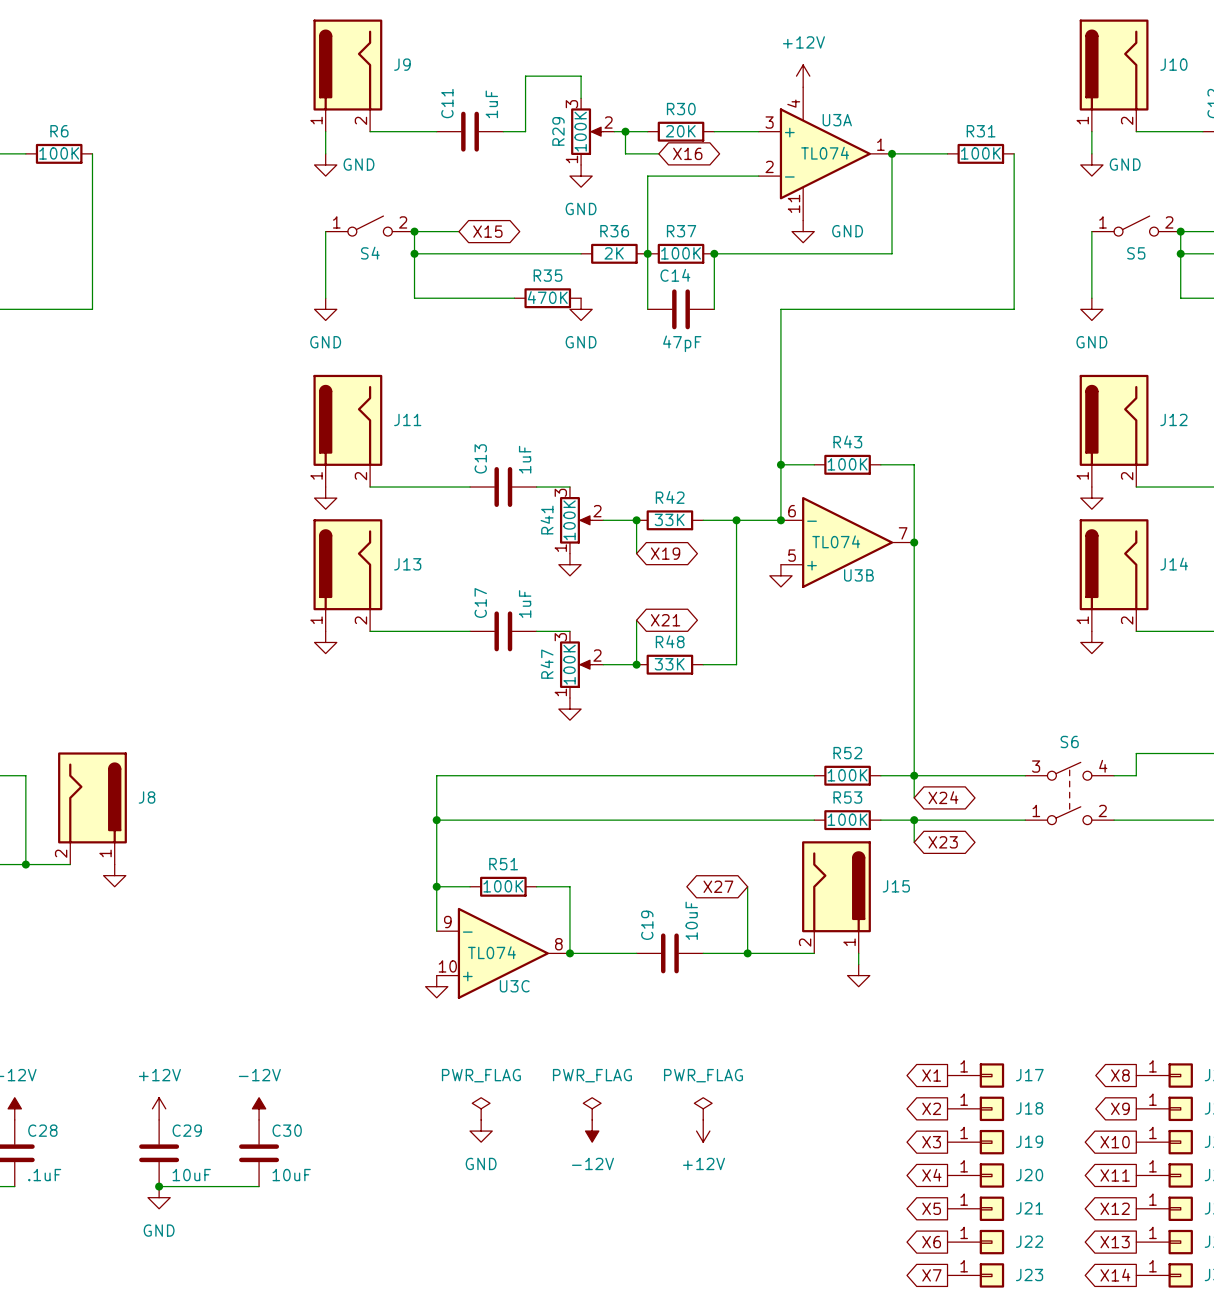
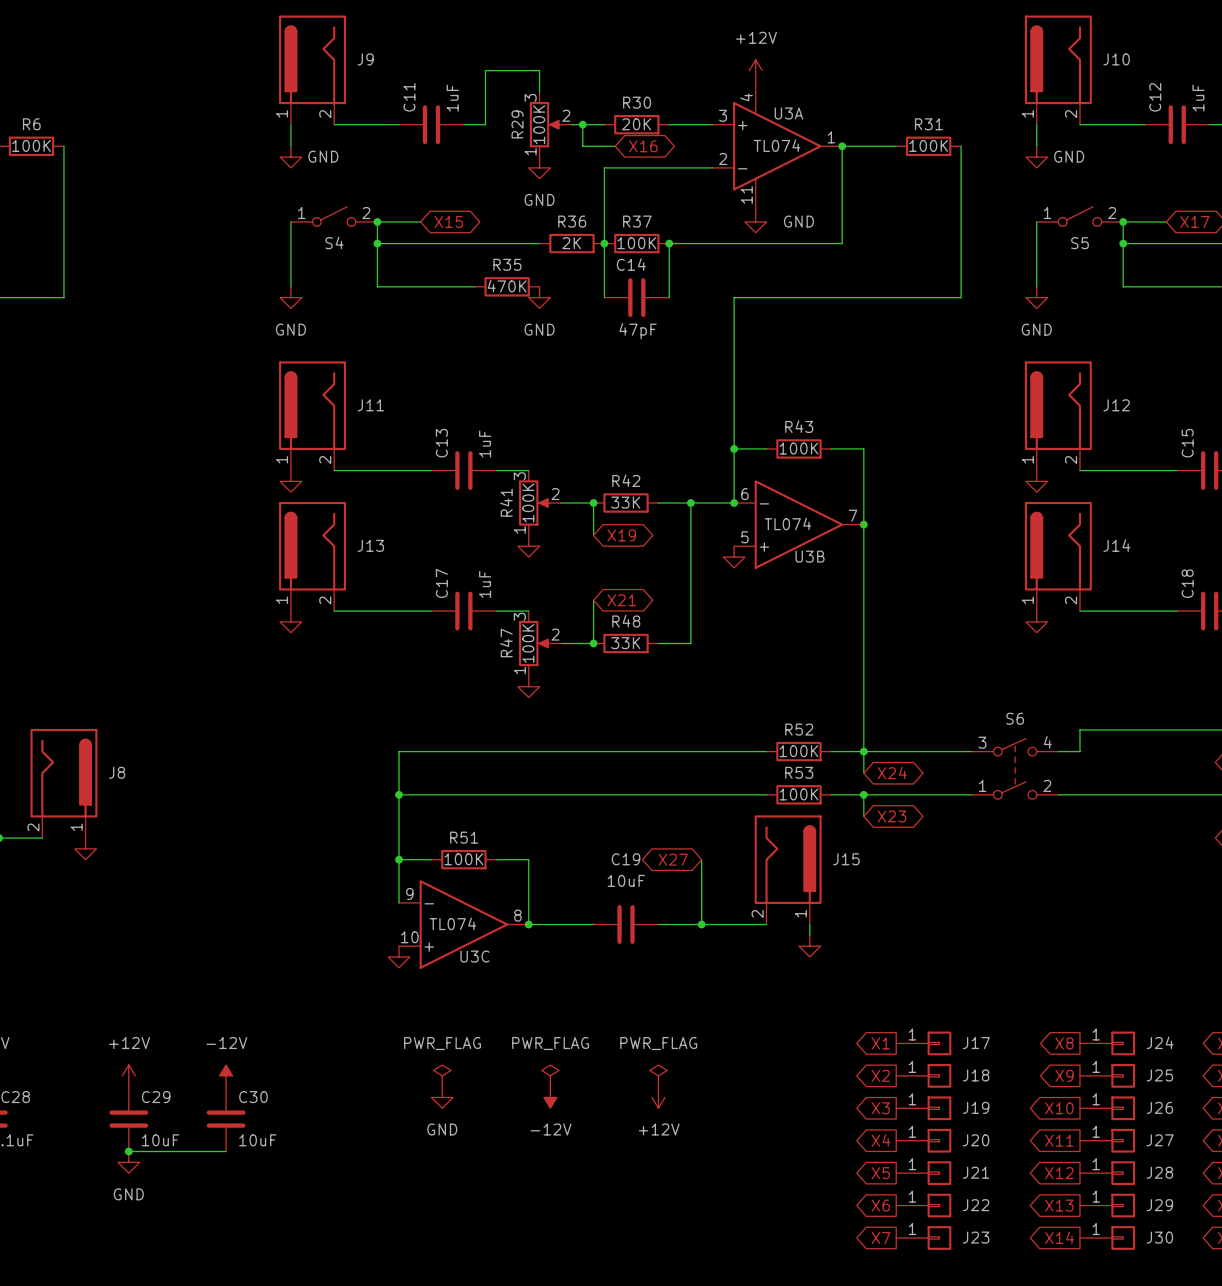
C19 value rotation: 0° (691, 920) -> 90° clockwise (626, 880)
C19 name rotation: 0° (647, 925) -> 90° clockwise (626, 859)
C19 name position: C19 (647, 925) -> C19 (626, 859)

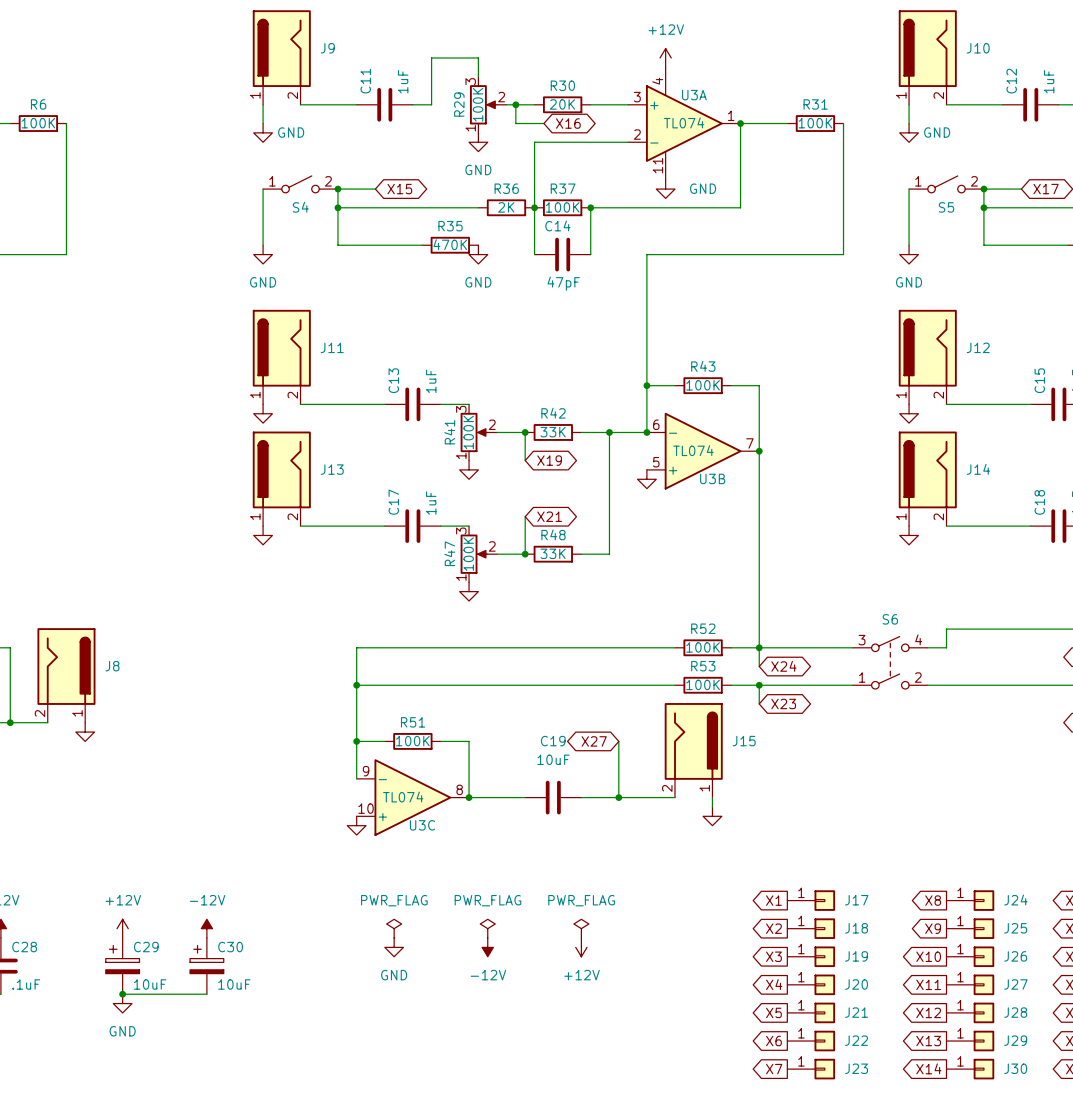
C29 symbol: [109, 1086, 149, 1152] -> [105, 938, 140, 995]
C30 symbol: [206, 1086, 246, 1152] -> [190, 938, 224, 995]

